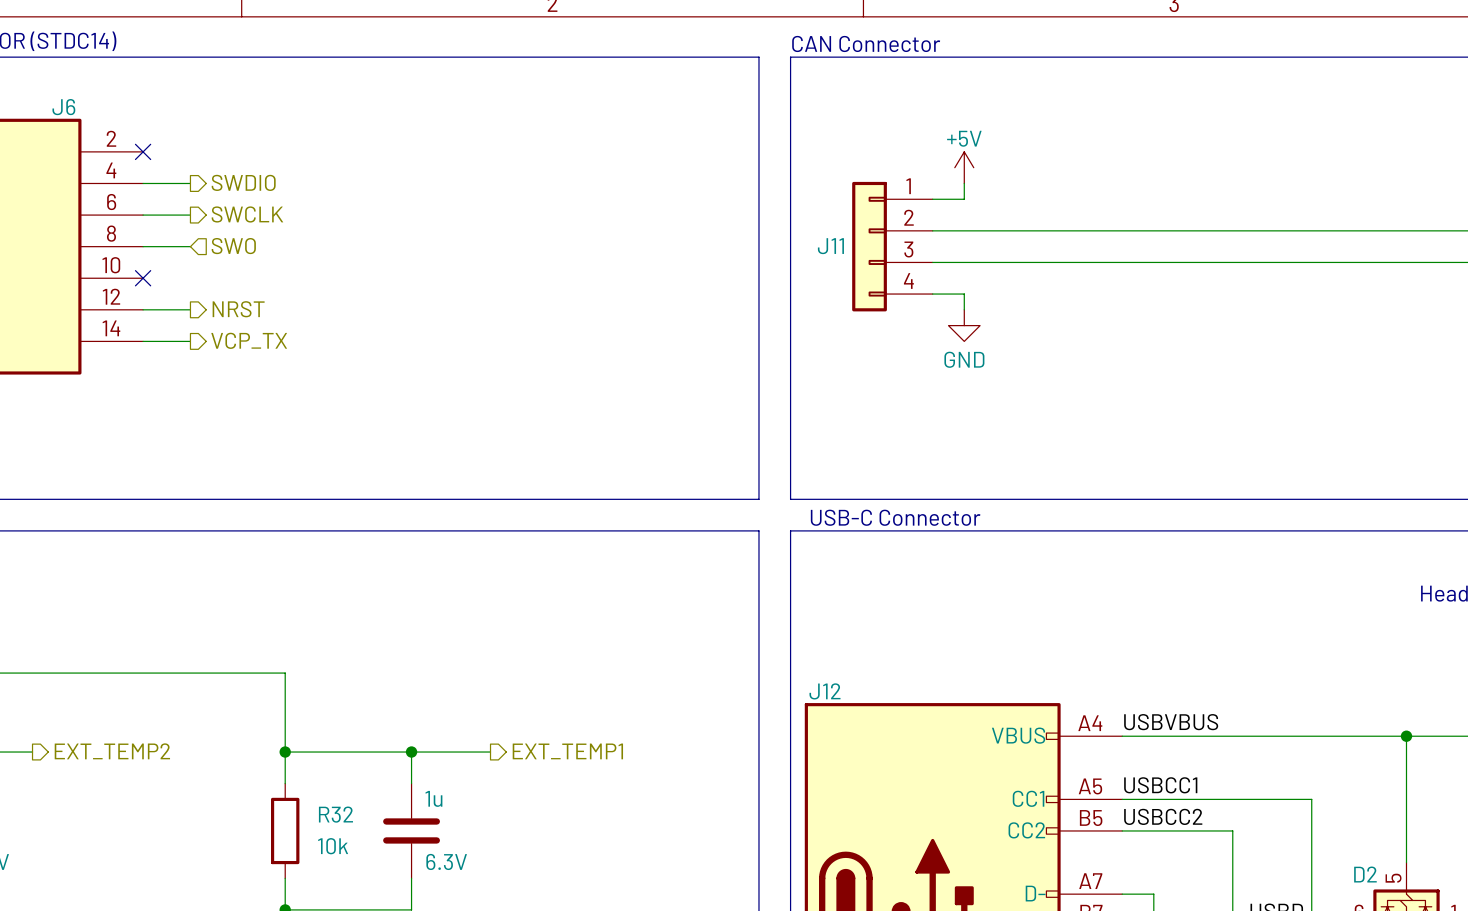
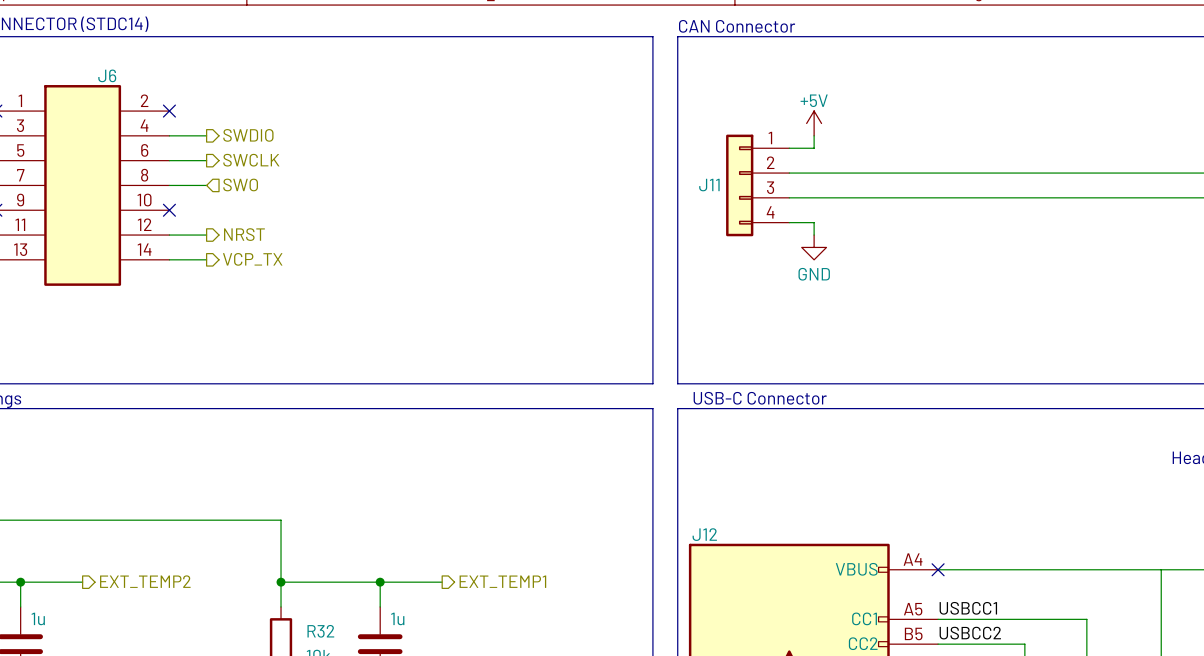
label: USBVBUS (1171, 722) -> none
no-connect mark: none -> (938, 569)
junction: (1406, 736) -> none

